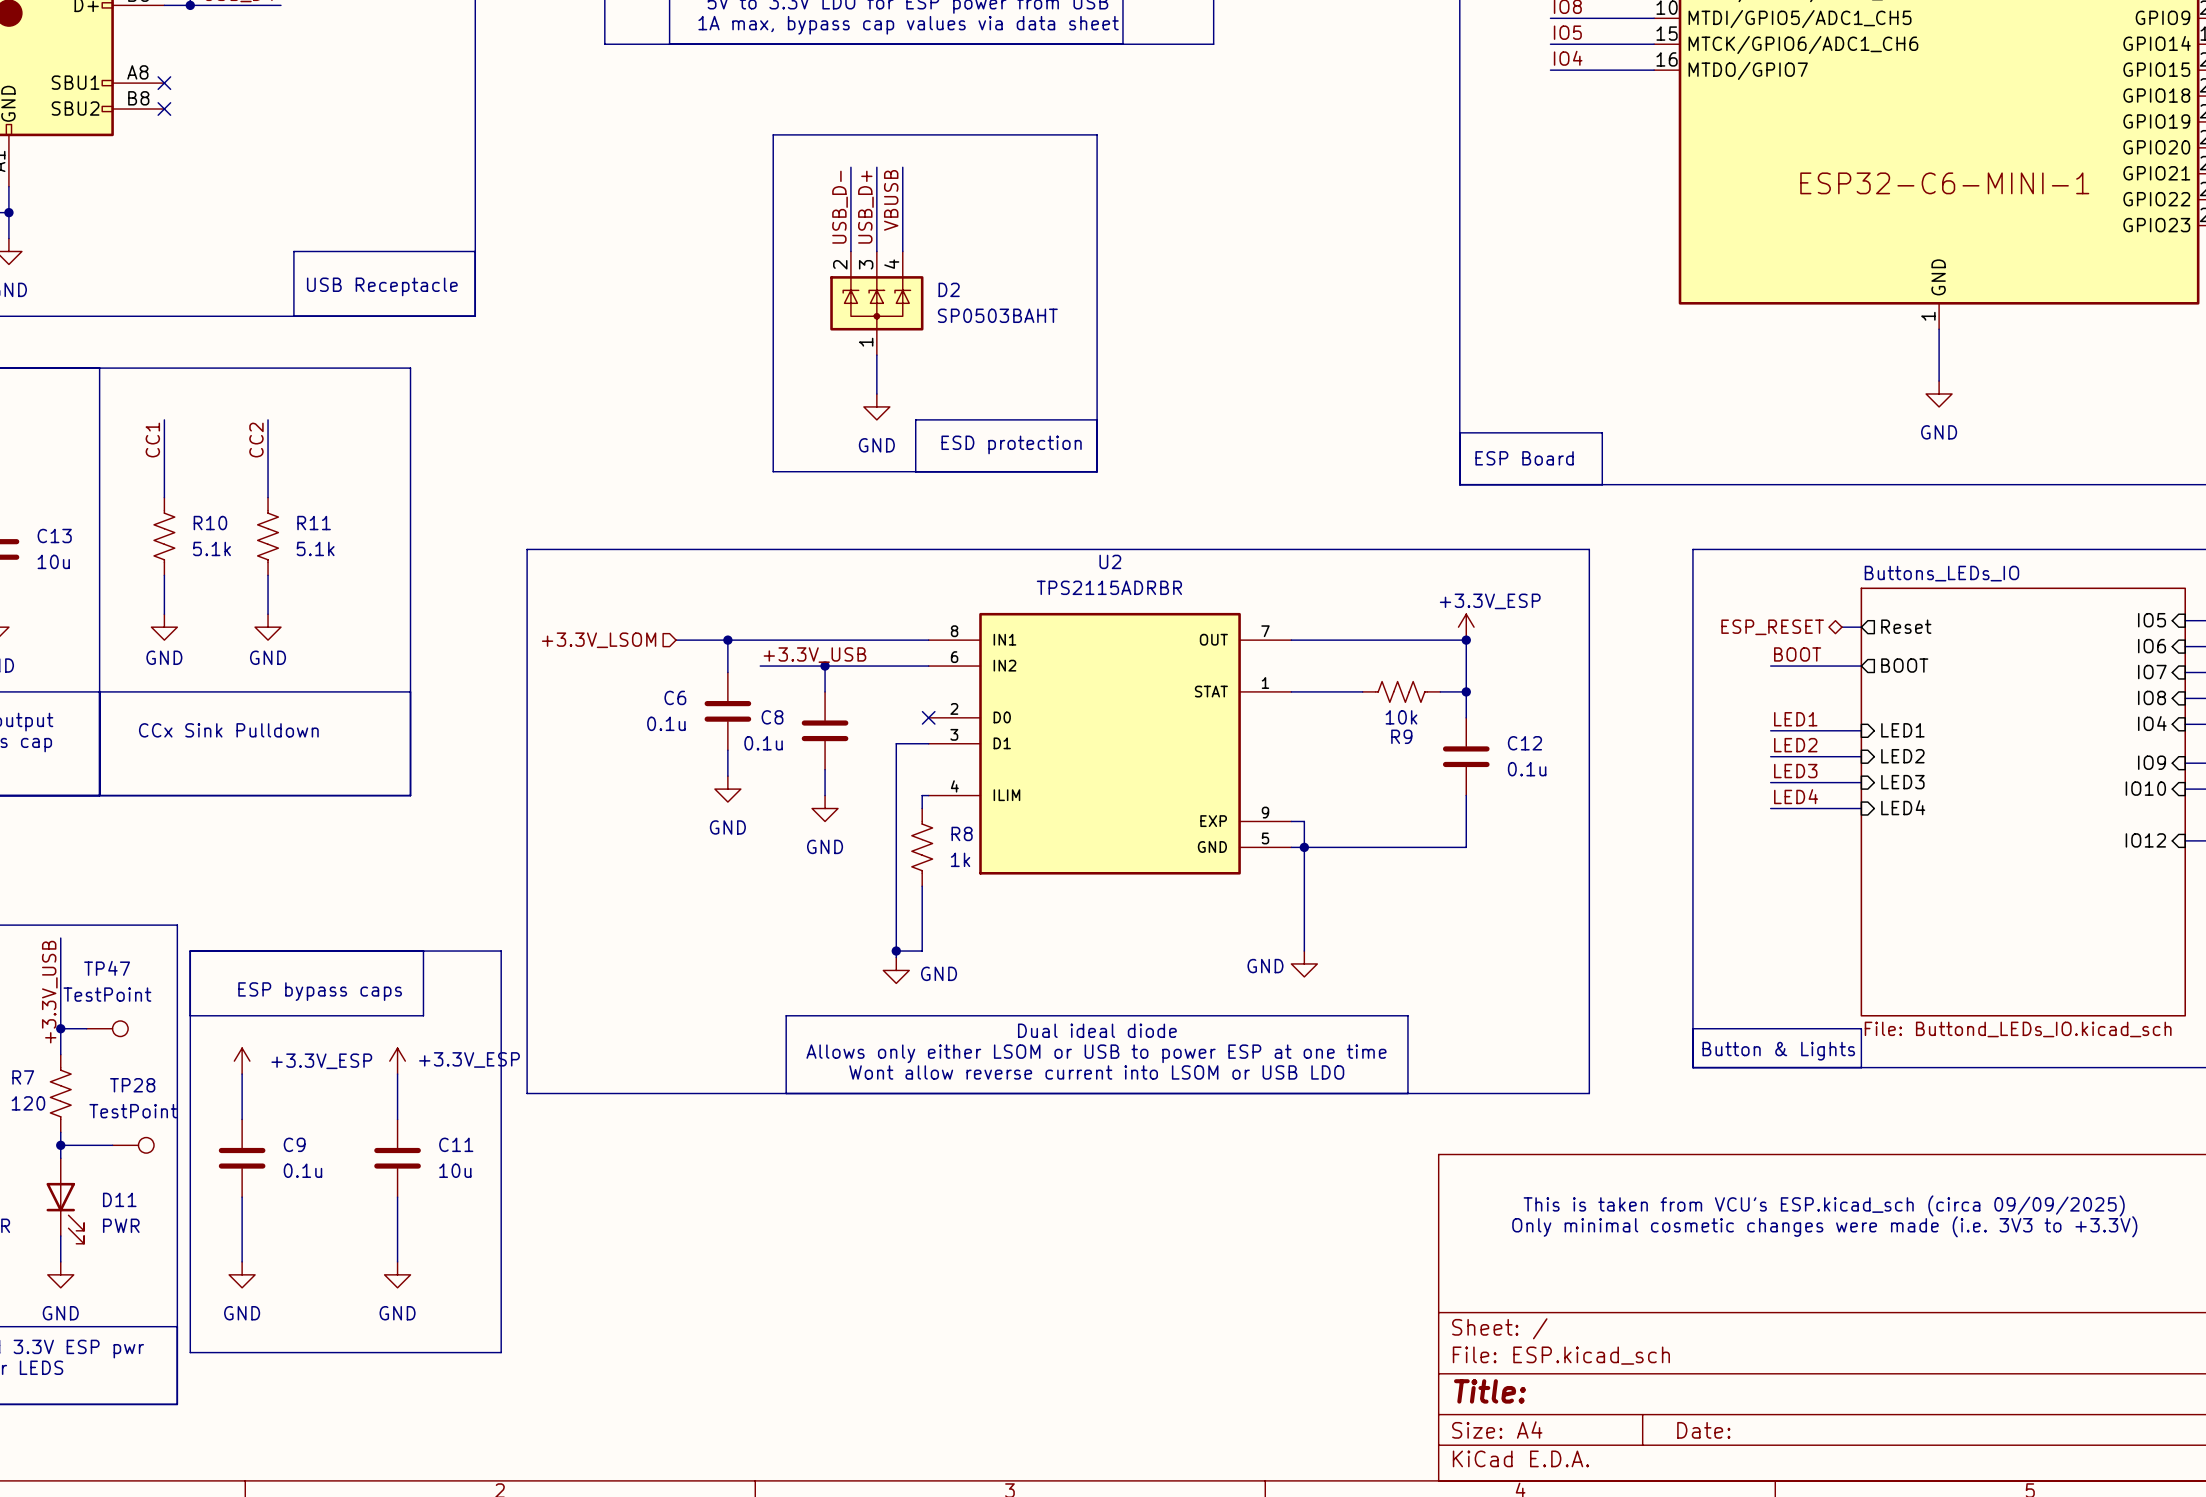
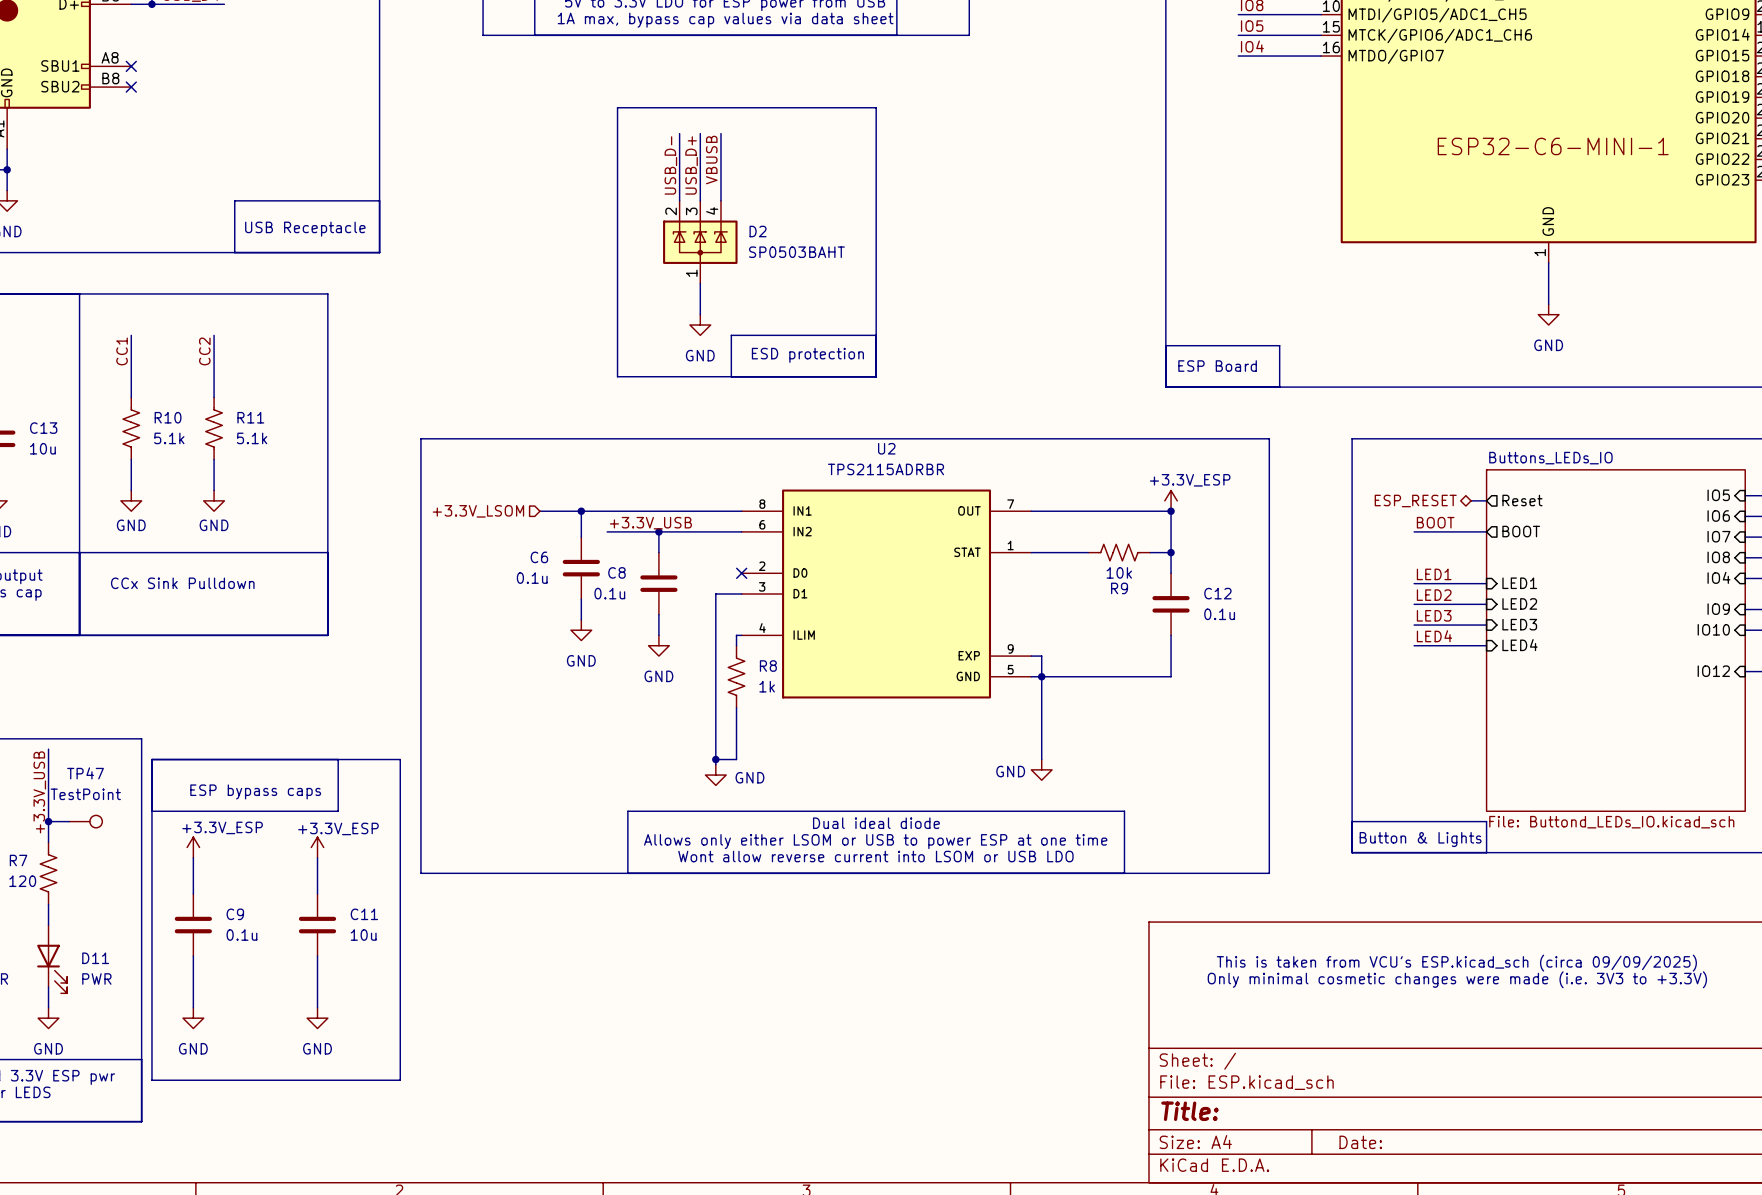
power symbol text position: +3.3V_ESP (469, 1059) -> +3.3V_ESP (338, 828)
power symbol text position: +3.3V_ESP (321, 1061) -> +3.3V_ESP (222, 827)
wire: (60, 1145) (112, 1145) -> none
junction: (60, 1145) -> none
TP28: TestPoint (133, 1145) -> none

